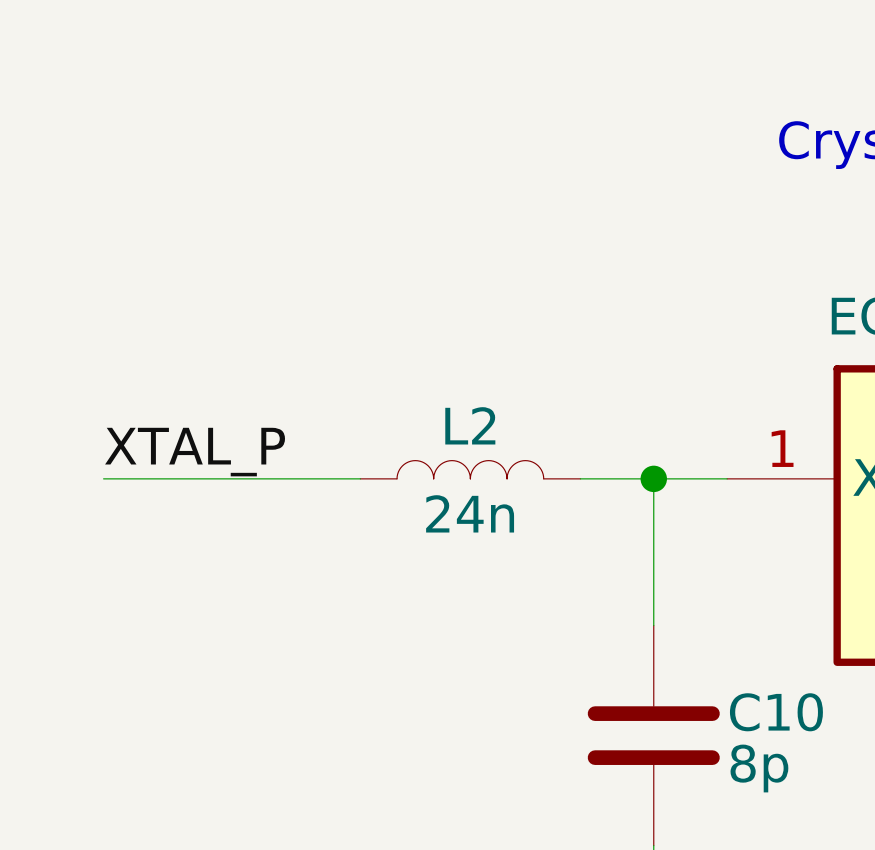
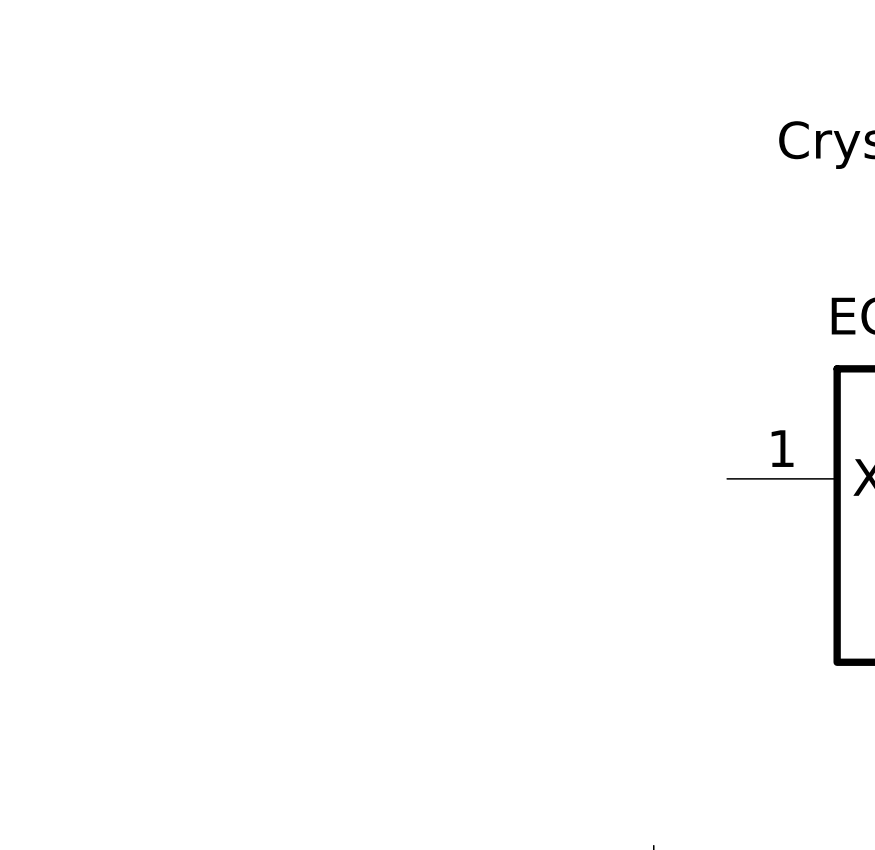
label: XTAL_P (195, 452) -> none
L2: 24n (470, 469) -> none
wire: (103, 478) (360, 478) -> none
wire: (580, 478) (727, 478) -> none
wire: (653, 478) (653, 625) -> none
junction: (653, 478) -> none
C10: 8p (653, 735) -> none

